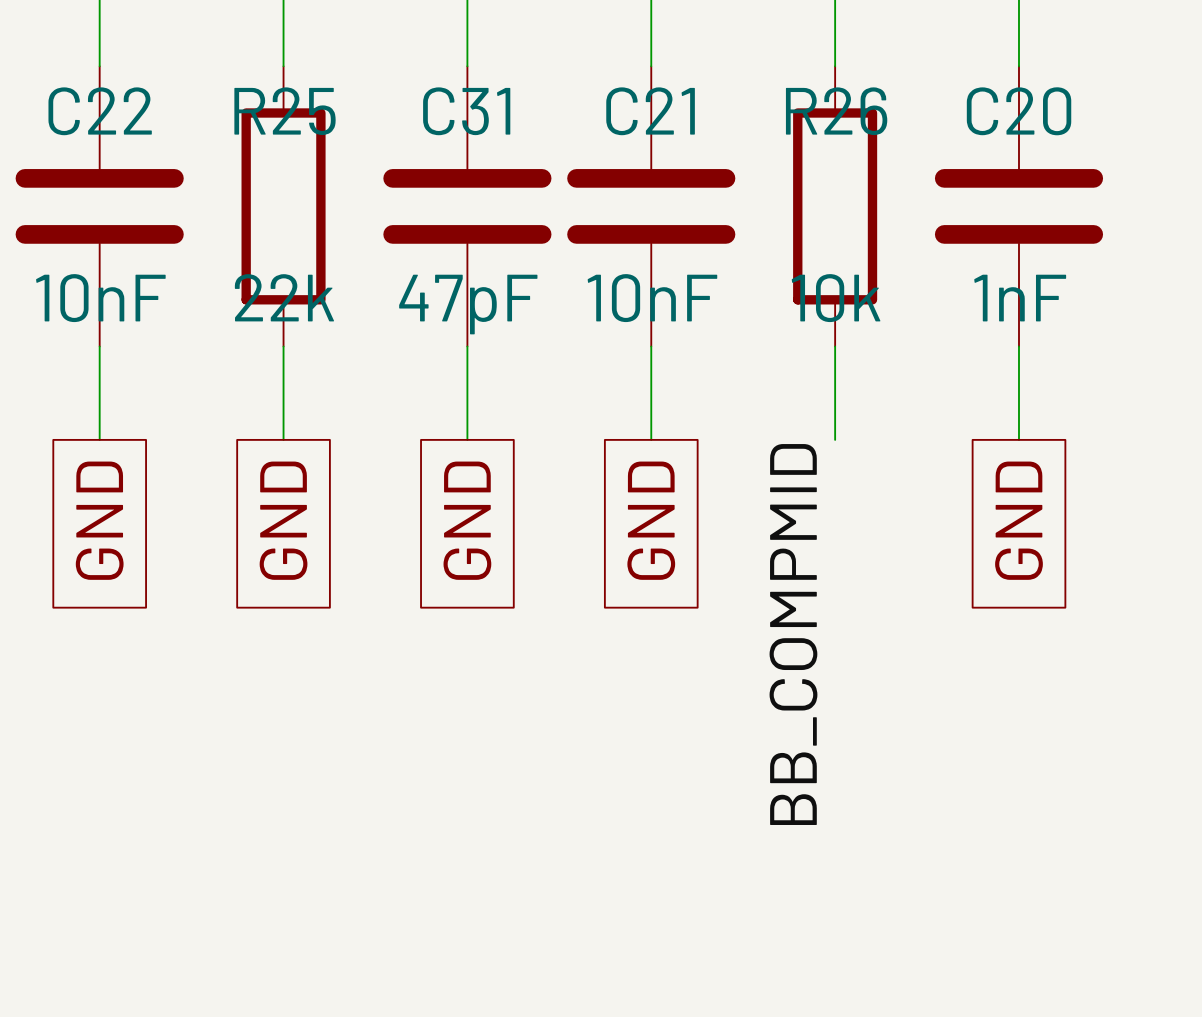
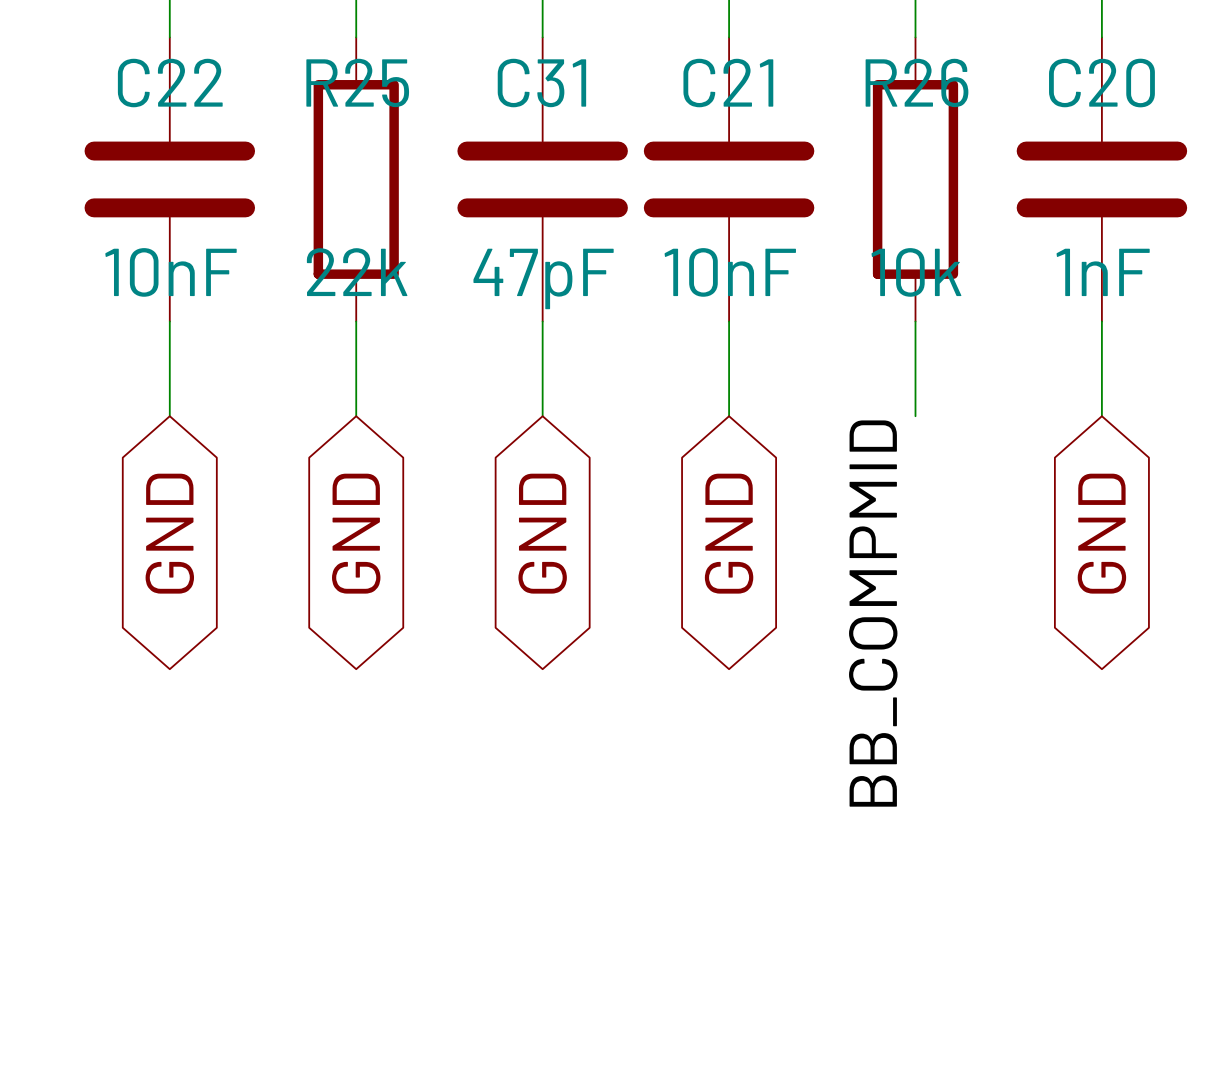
global label shape: passive (99, 520) -> bidirectional (169, 533)
global label shape: passive (283, 520) -> bidirectional (356, 533)
global label shape: passive (467, 520) -> bidirectional (542, 533)
global label shape: passive (651, 520) -> bidirectional (729, 533)
global label shape: passive (1018, 520) -> bidirectional (1101, 533)

